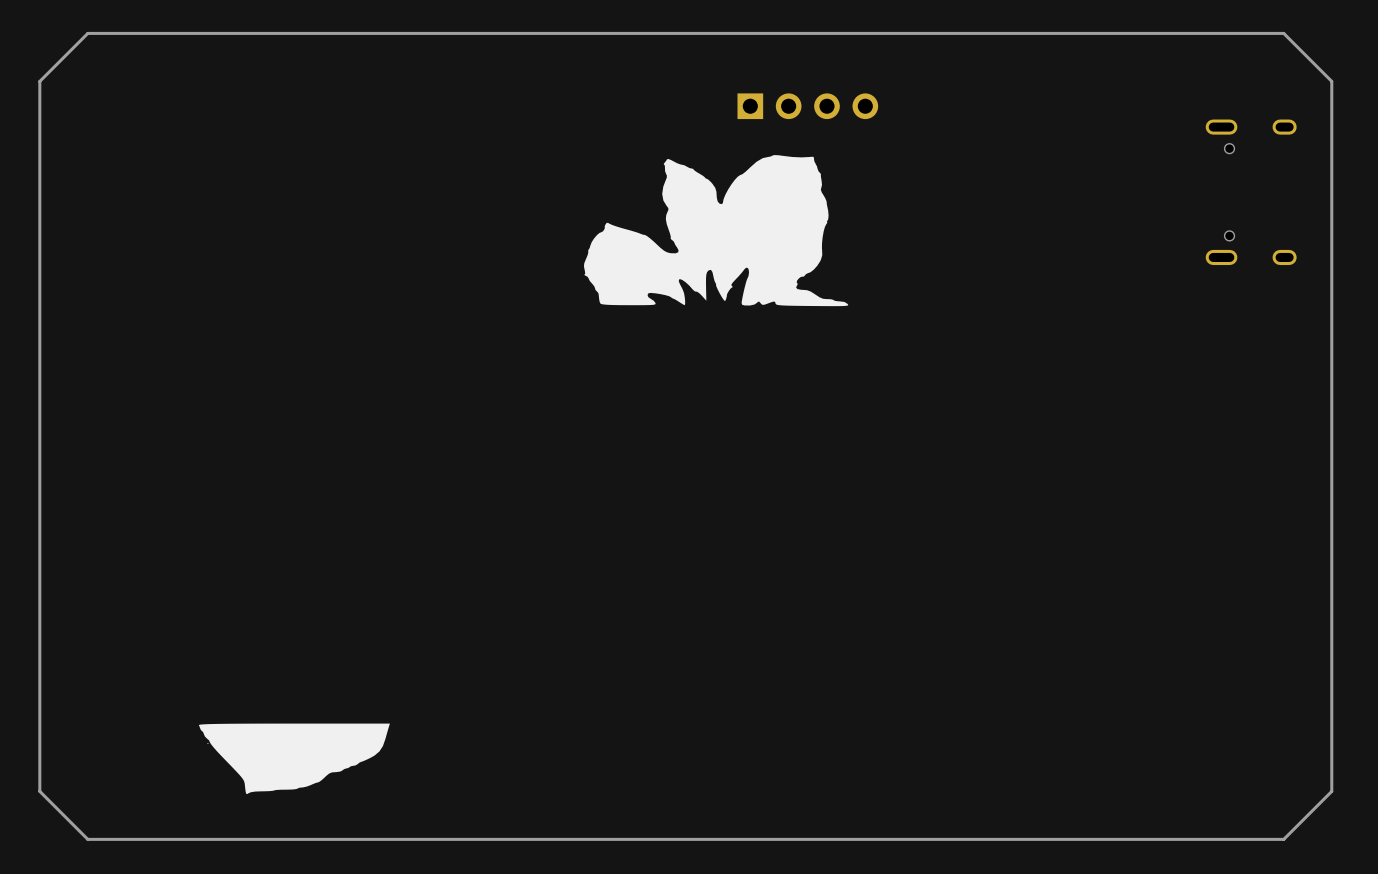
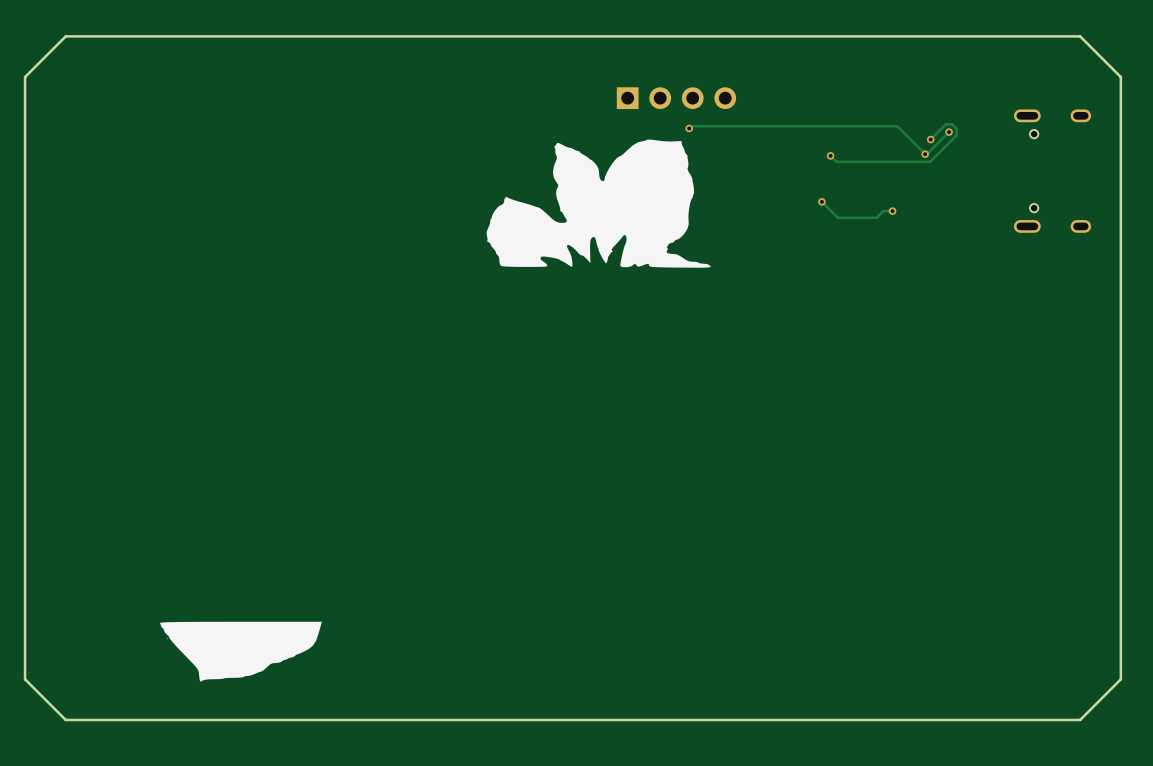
track: none -> (689, 128) (691, 126) (897, 126) (925, 154) (949, 132)
via: none -> (689, 128)
via: none -> (949, 132)
track: none -> (930, 139) (945, 124) (952, 124) (956, 128) (956, 135) (930, 161) (836, 161) (830, 155)
via: none -> (930, 139)
via: none -> (925, 154)
via: none -> (830, 155)
track: none -> (821, 201) (837, 217) (876, 217) (883, 211) (892, 211)
via: none -> (821, 201)
via: none -> (892, 211)

